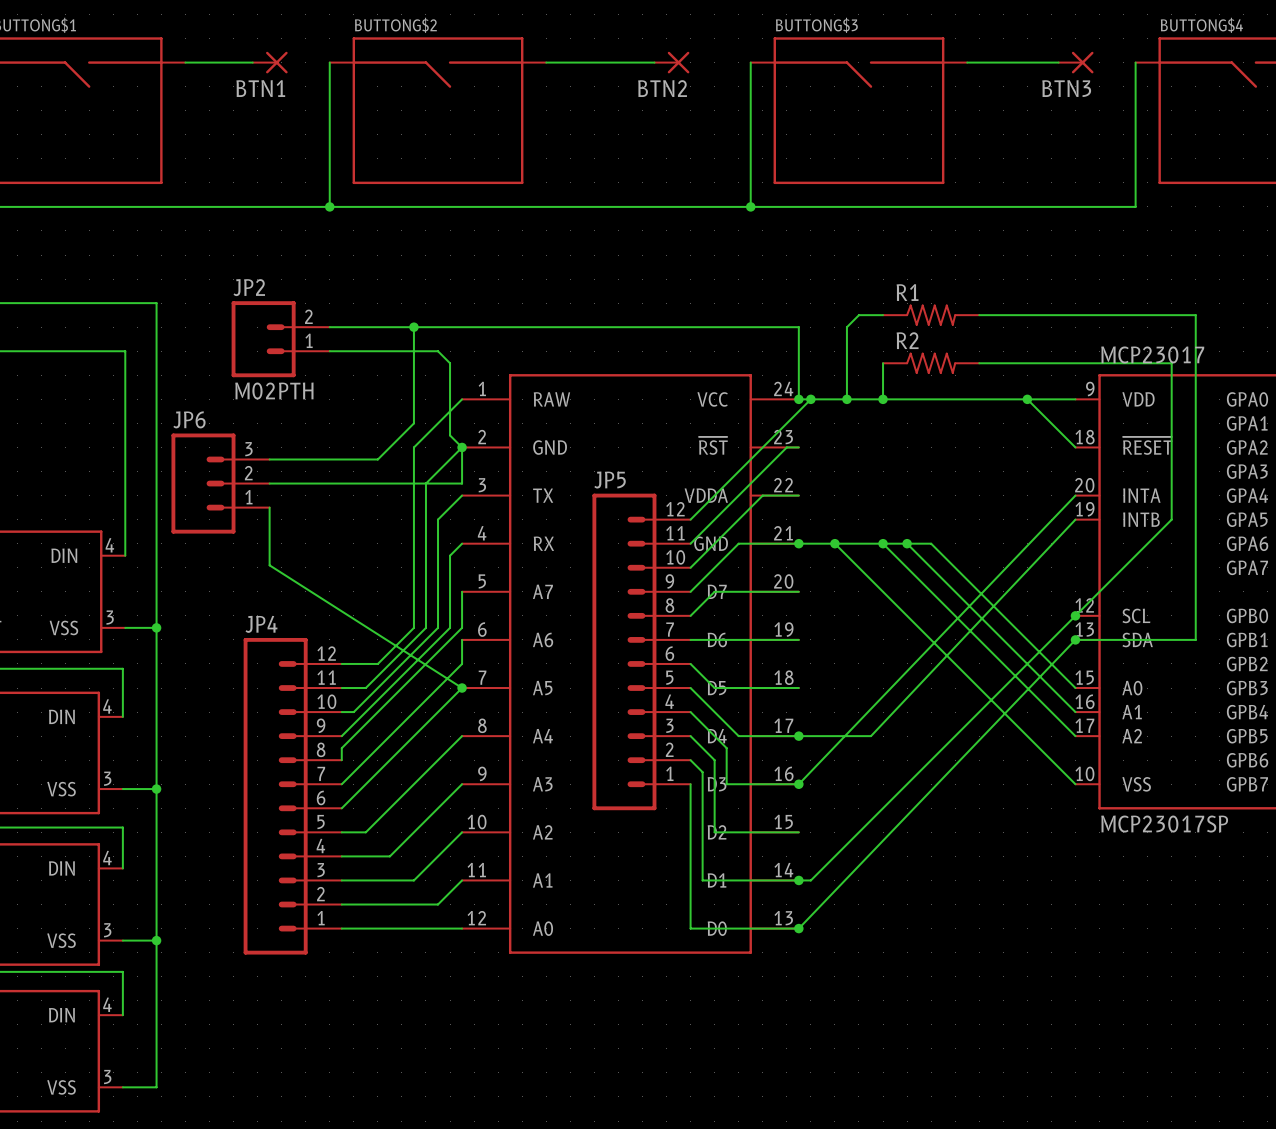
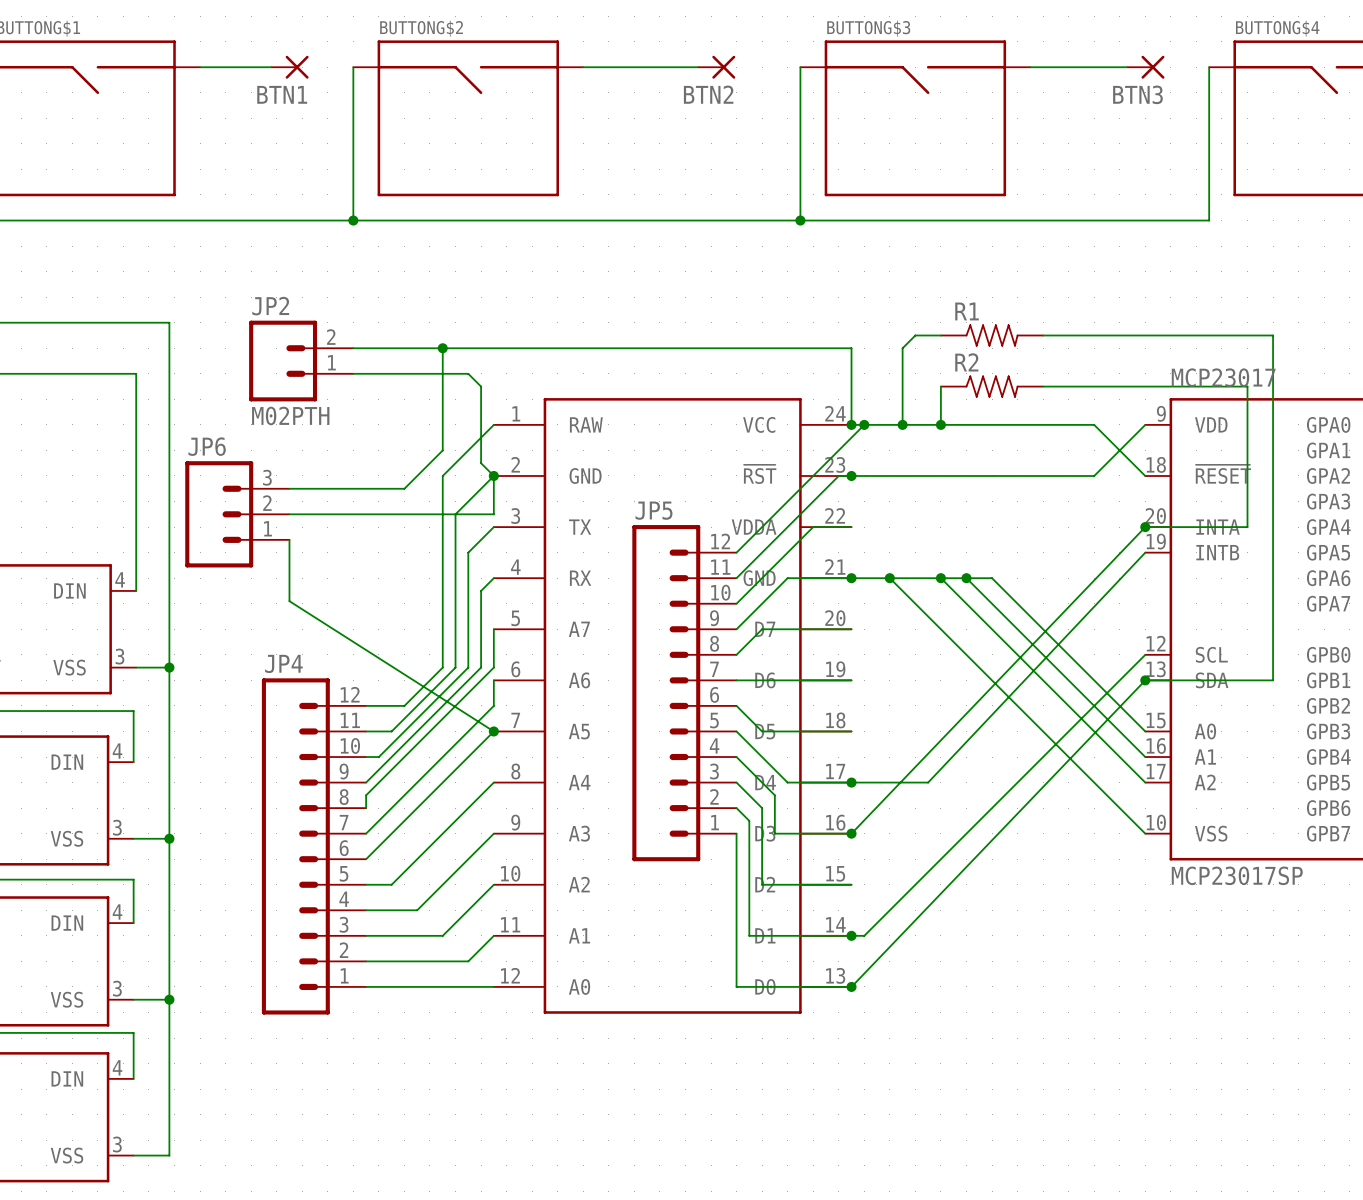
wire: (1027, 399) (1075, 399) -> (851, 475) (1094, 475) (1145, 424)
junction: (1027, 399) -> none
junction: none -> (851, 475)
junction: none -> (1145, 527)
wire: (1171, 495) (1171, 519) (1075, 615) -> (1247, 527) (1145, 527)
junction: (1075, 615) -> none

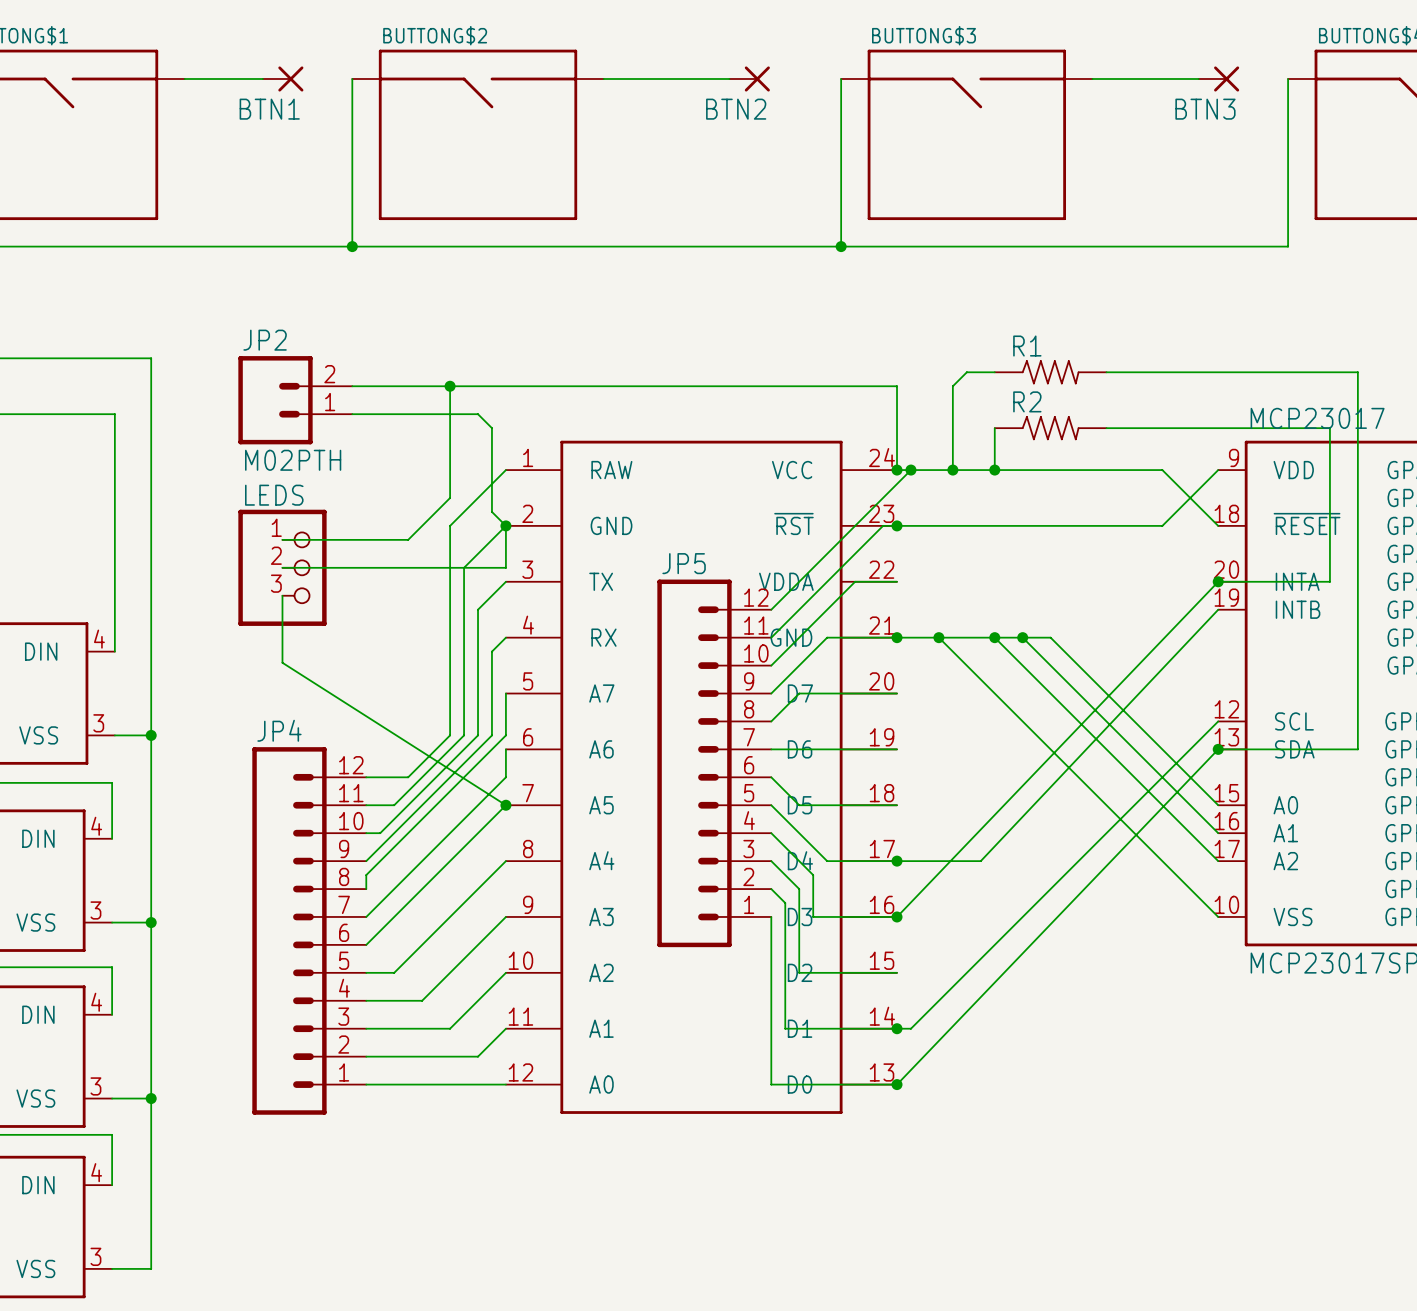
JP6: (237, 514) -> none
LEDS: none -> (282, 567)

